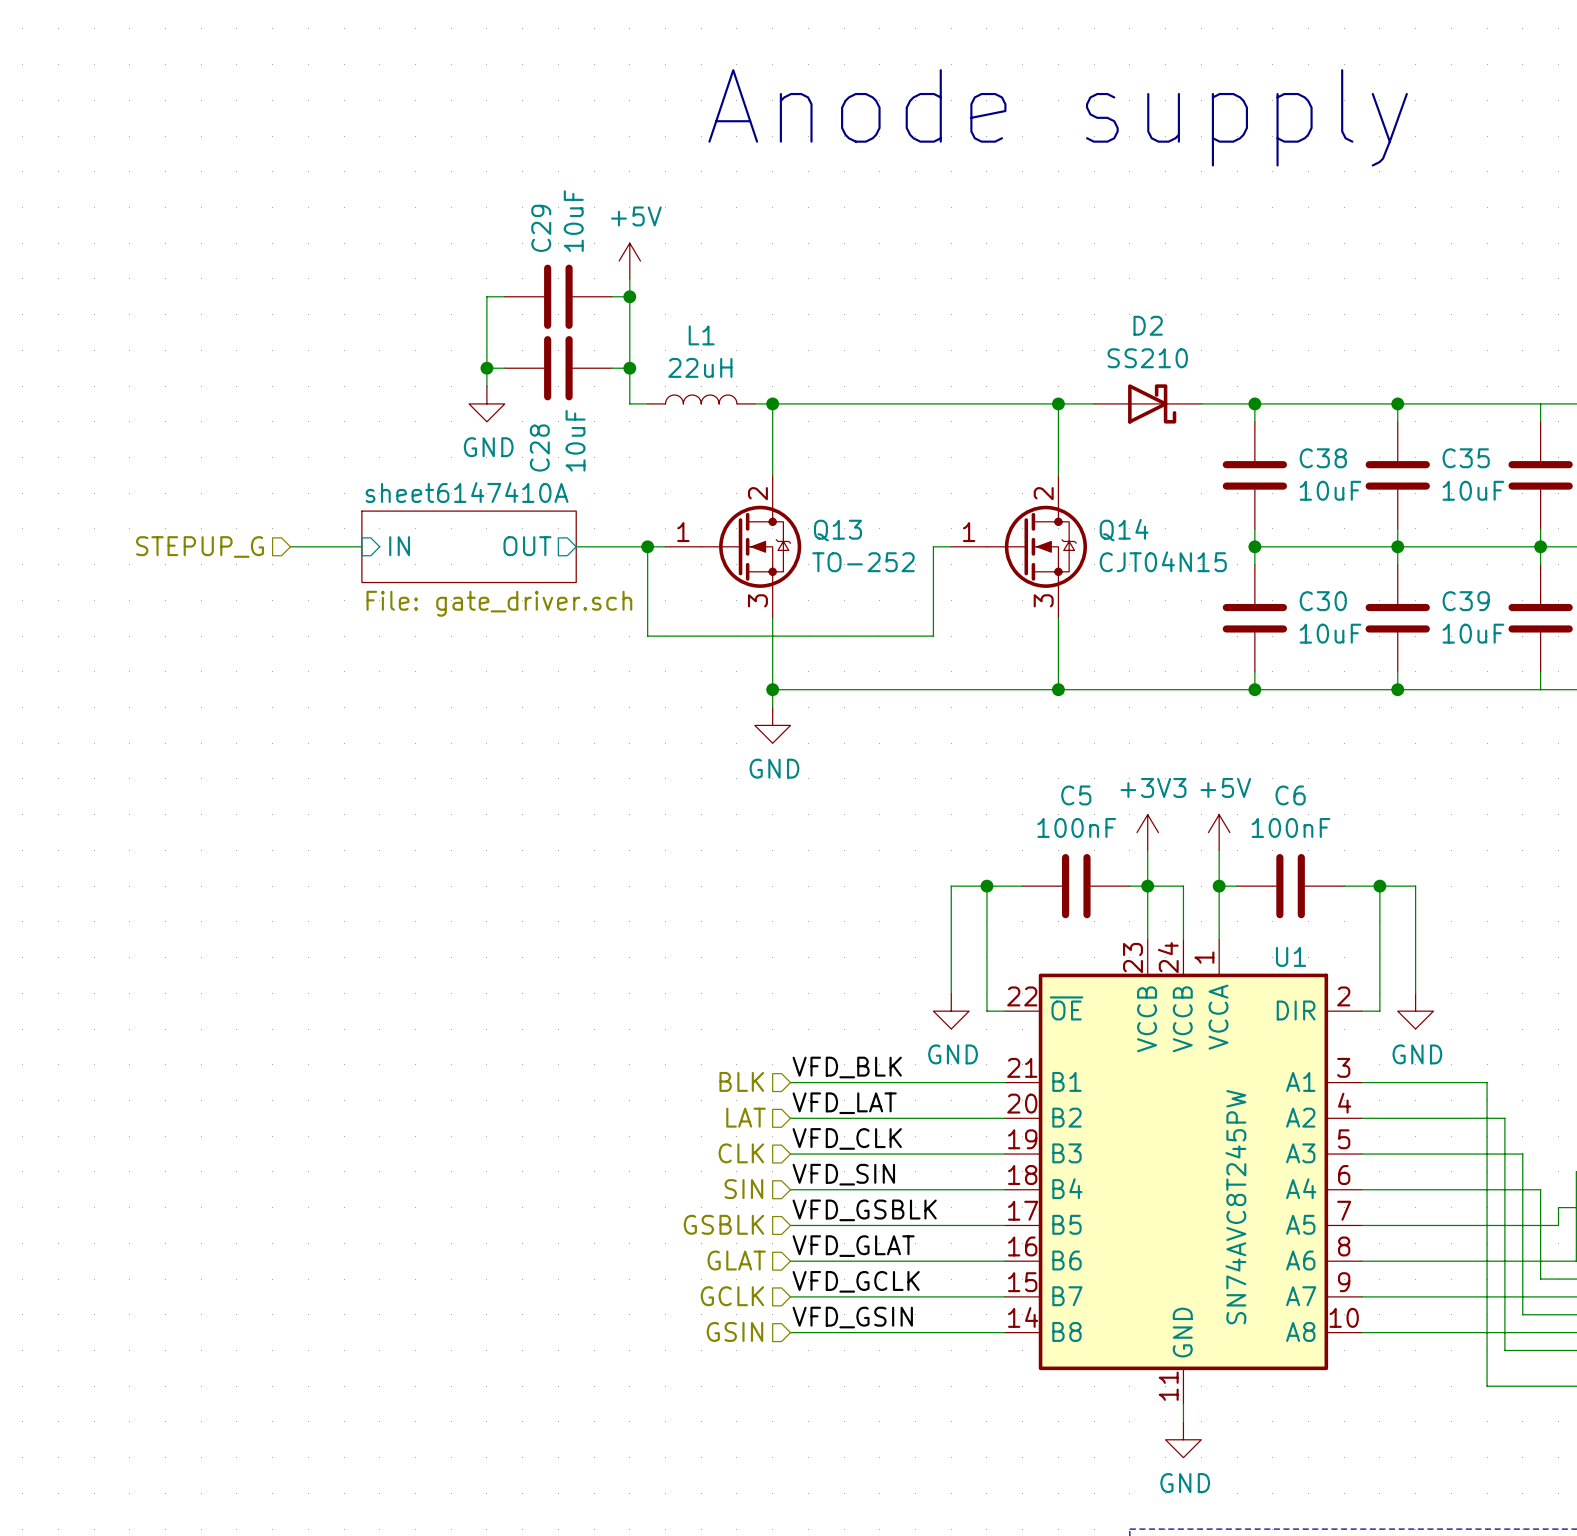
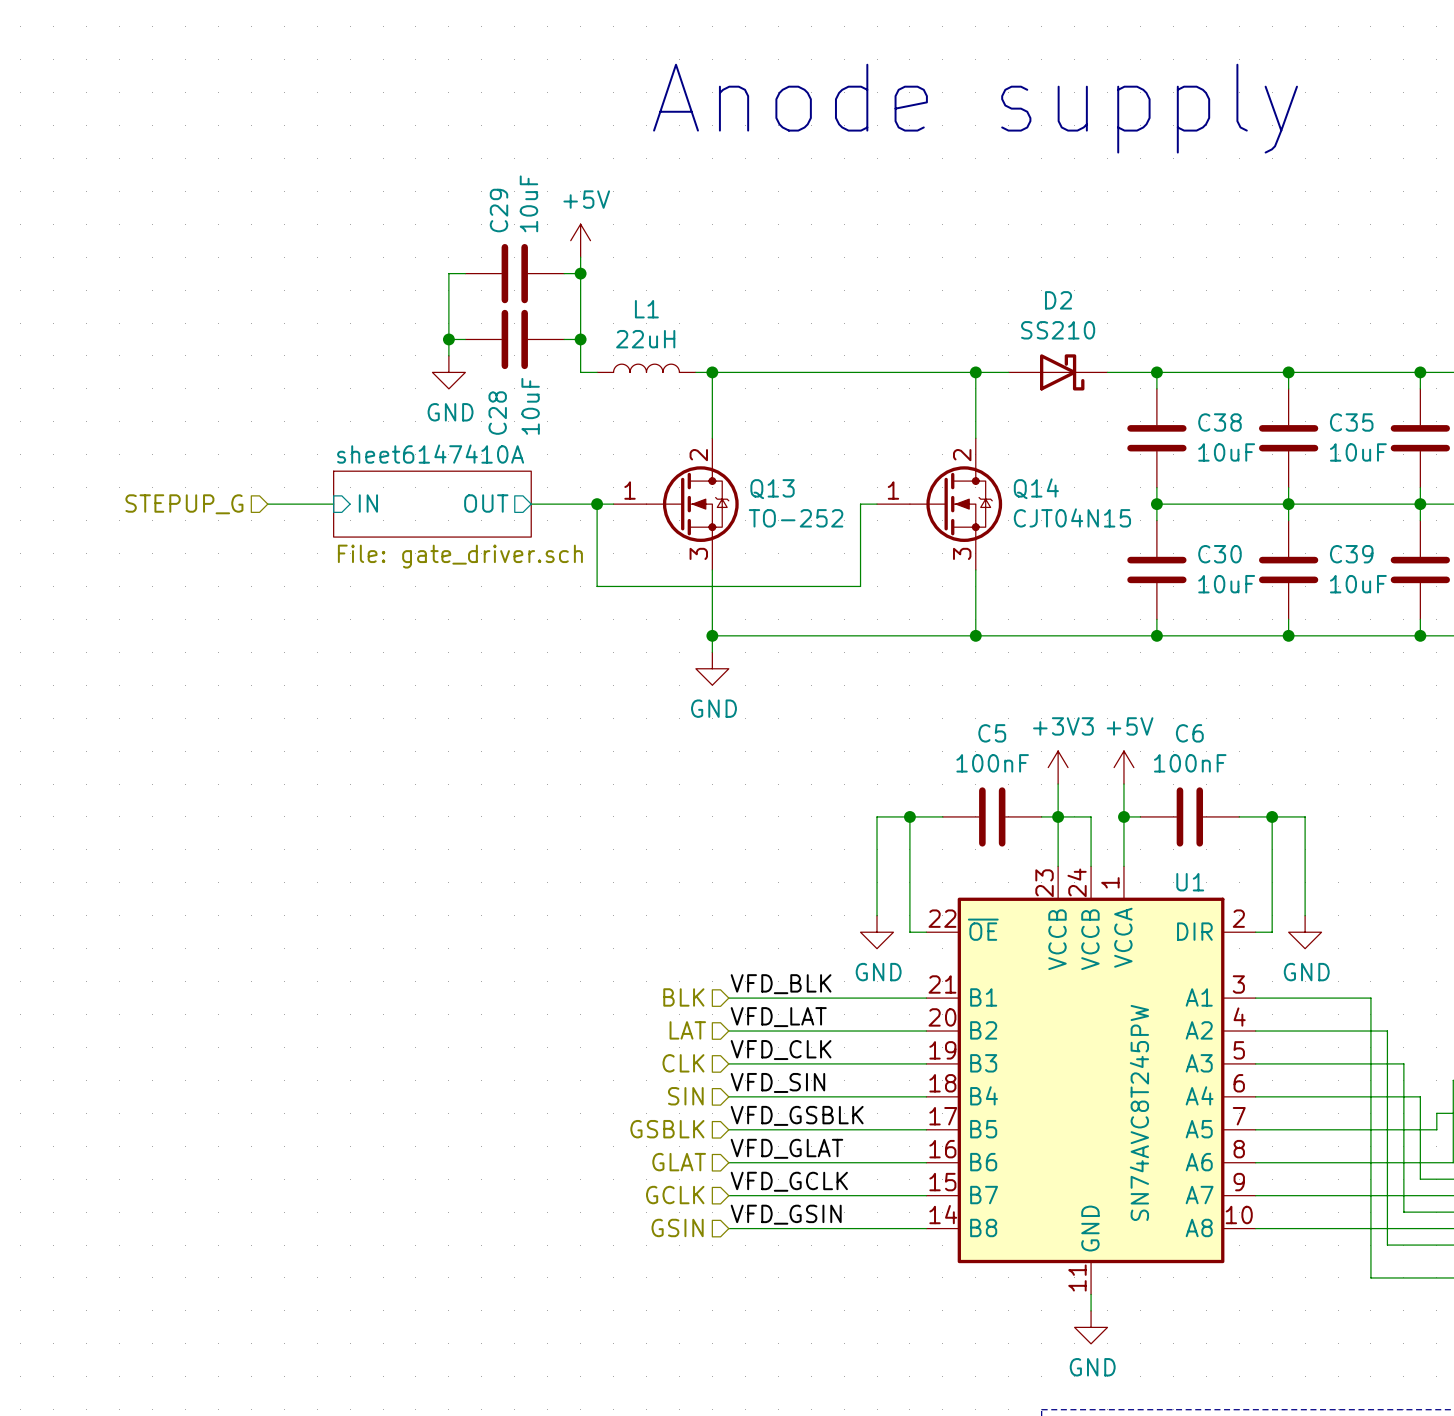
junction: none -> (1420, 372)
junction: none -> (1420, 635)

